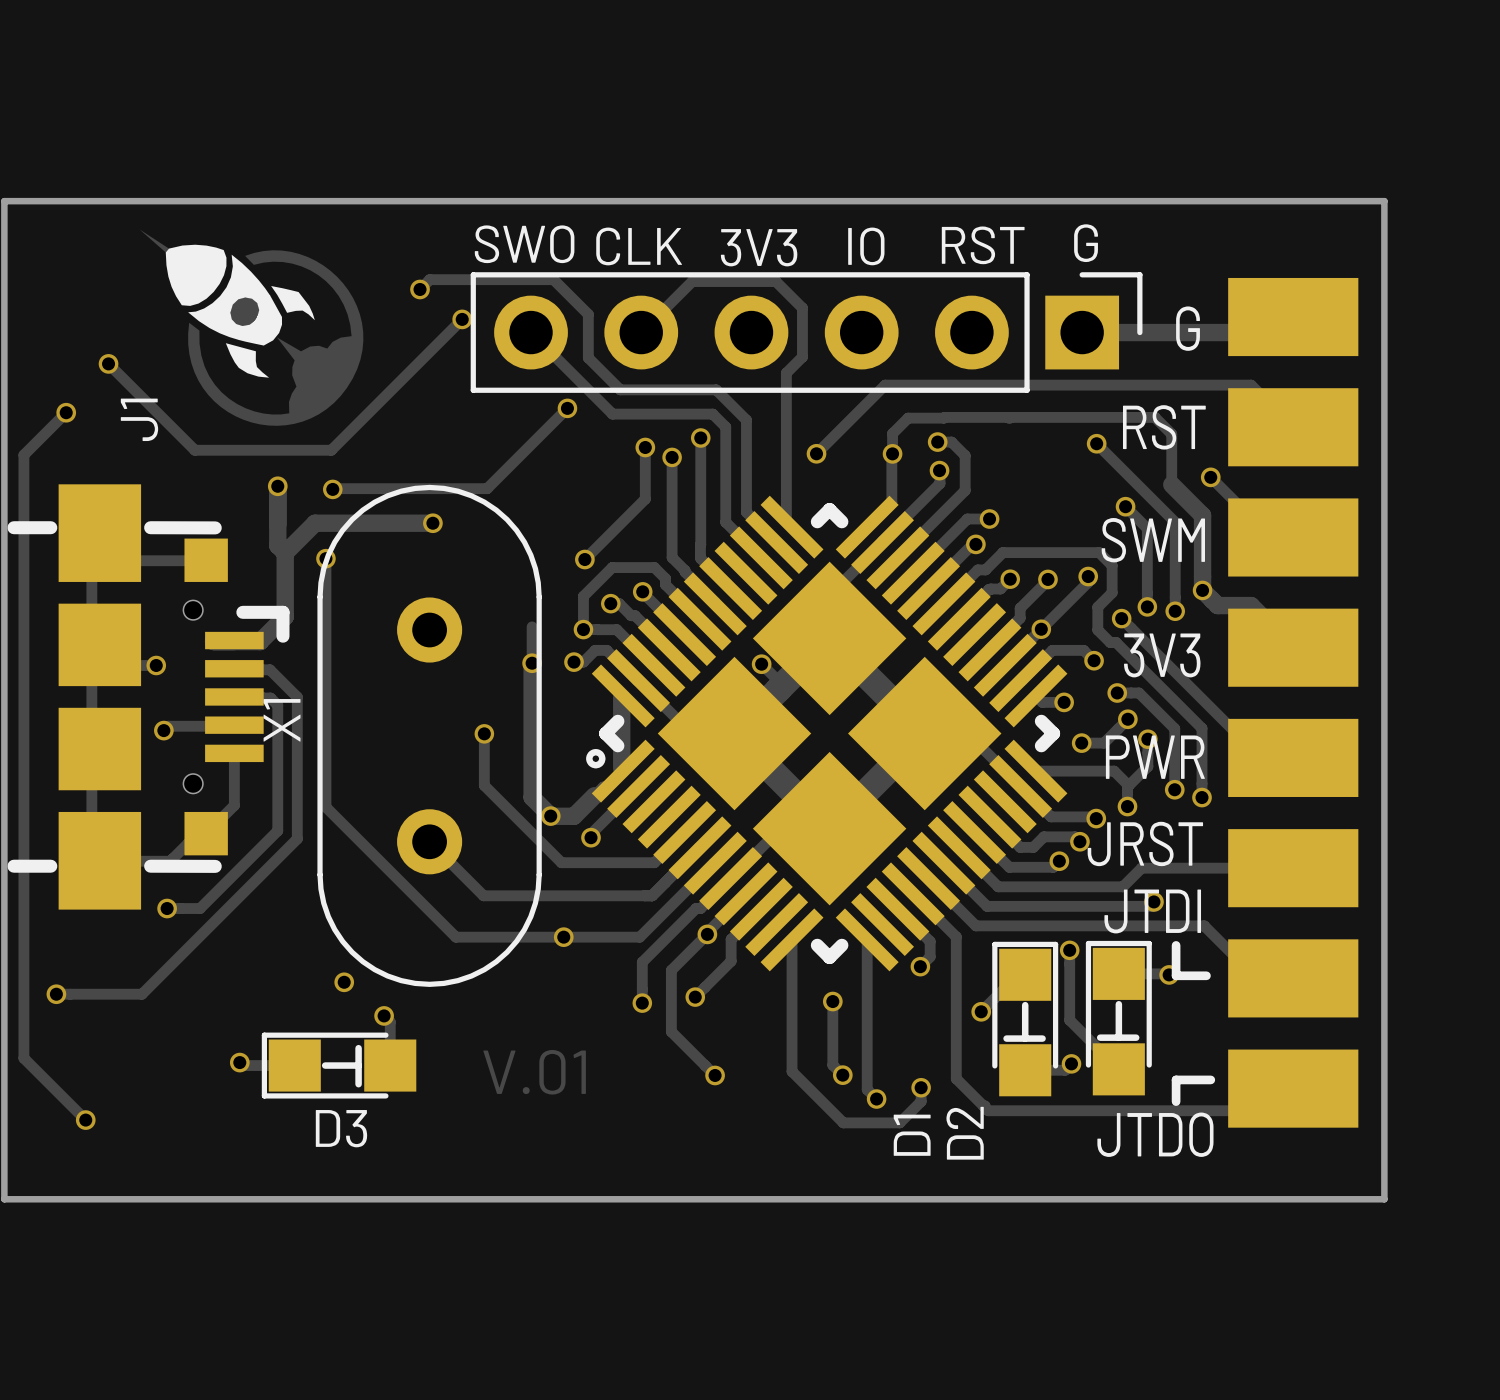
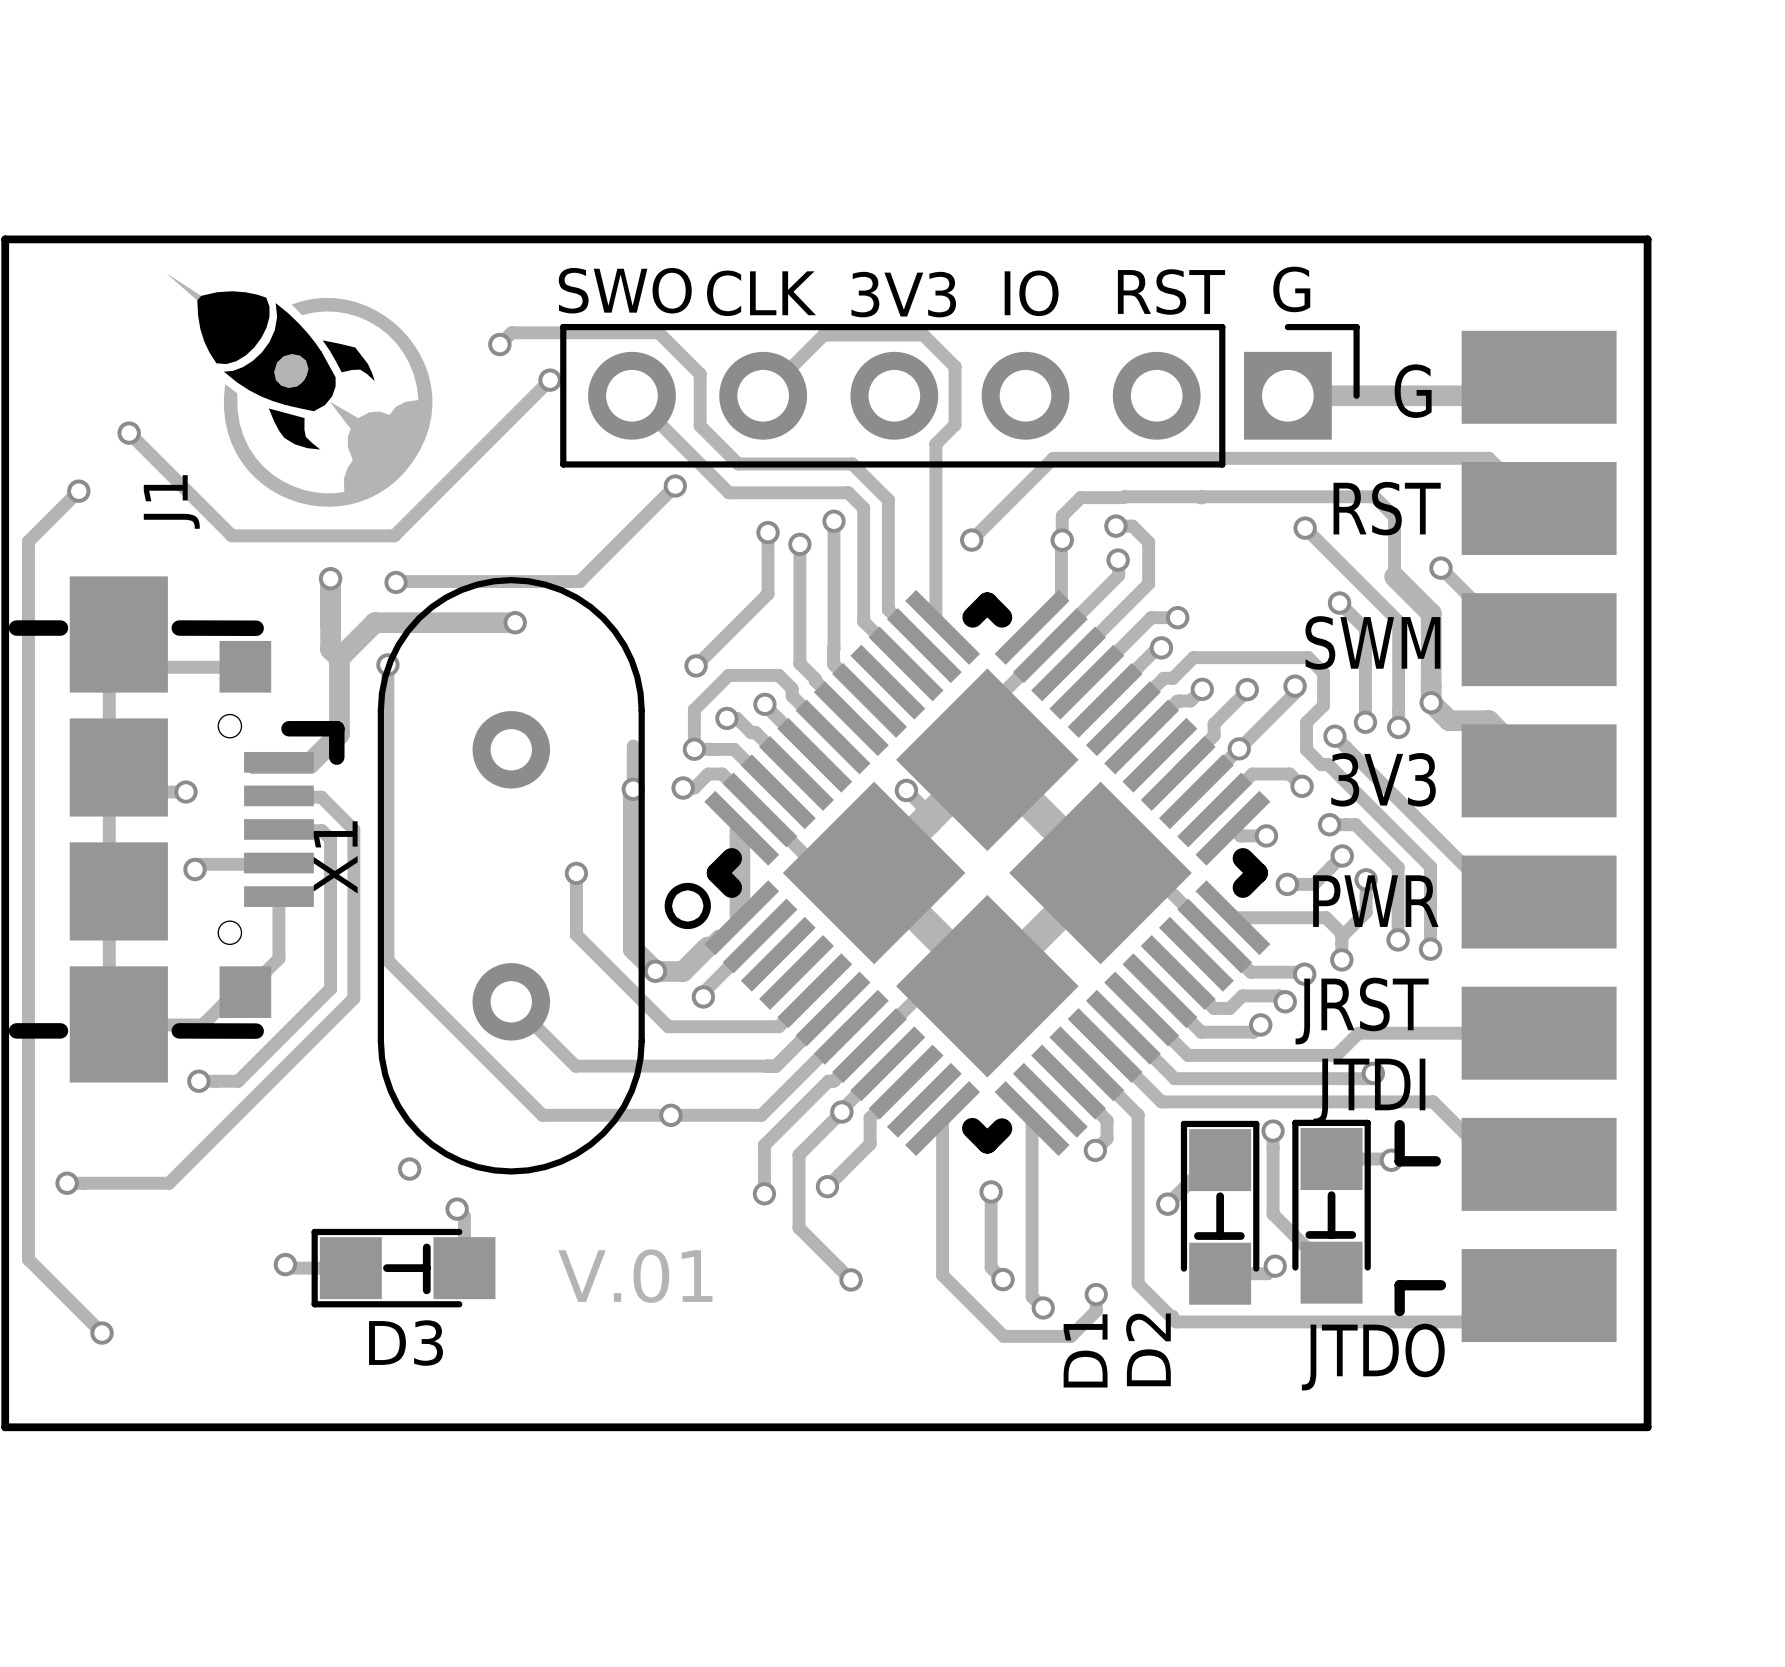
part footprint: [586, 495, 1068, 972] -> [664, 589, 1271, 1157]

